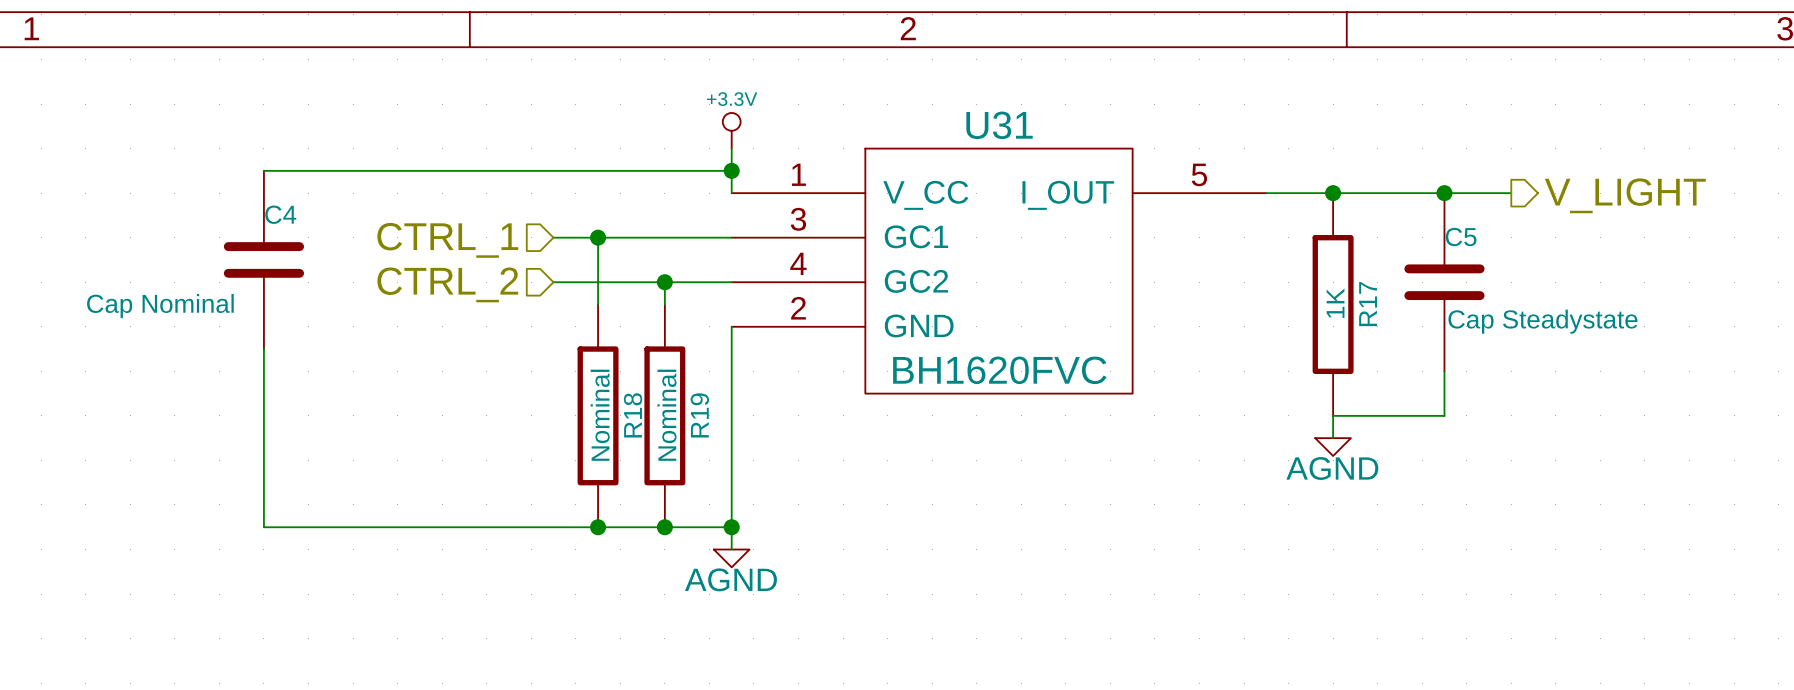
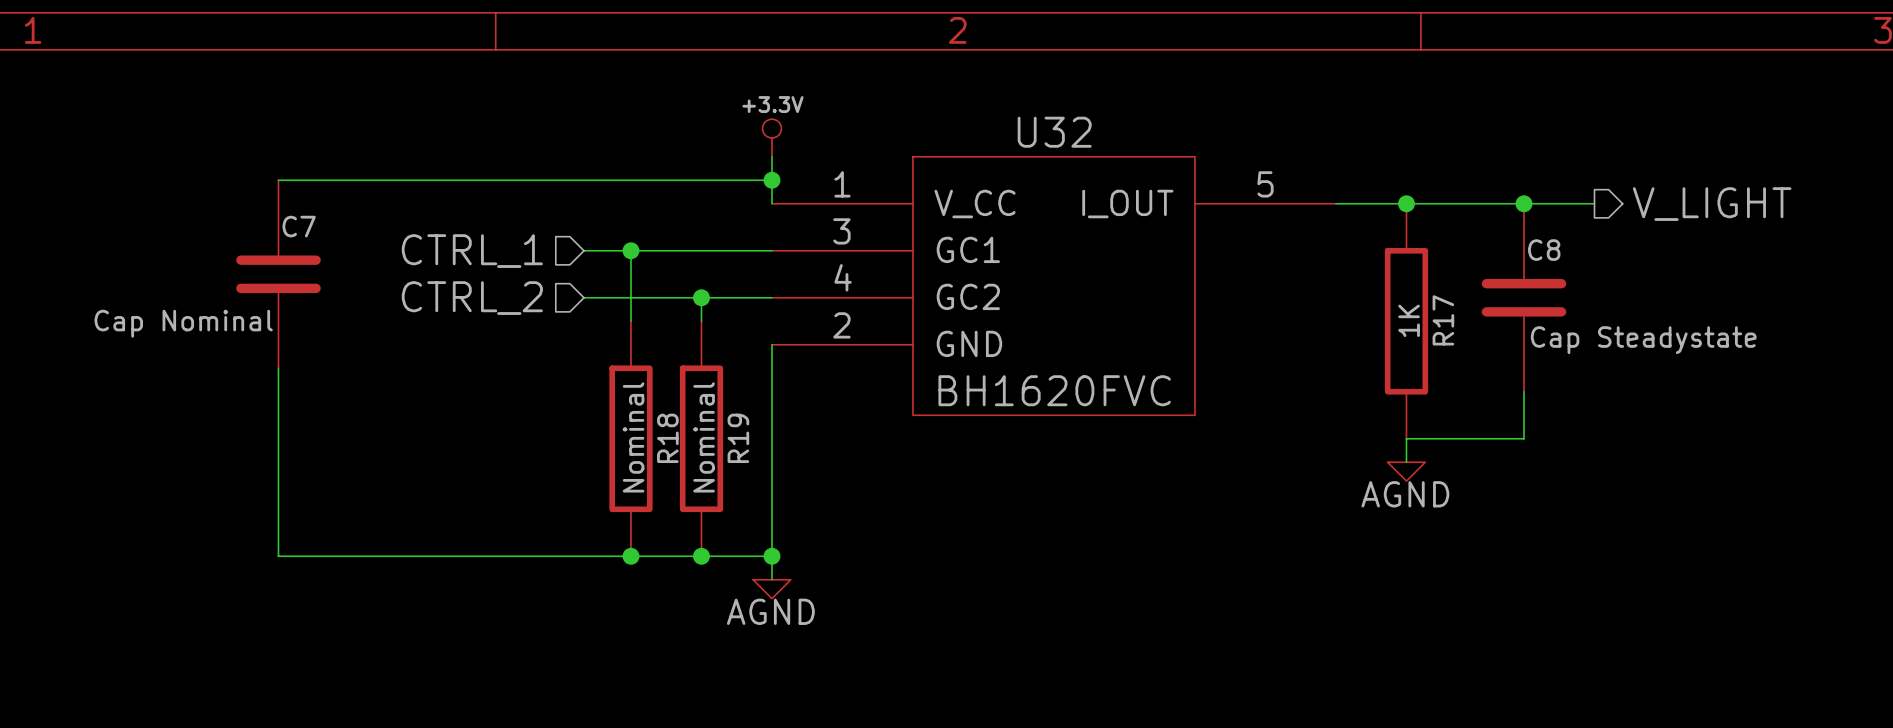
U31 name: U31 (999, 125) -> U32 (1054, 132)
C4 name: C4 (280, 214) -> C7 (299, 226)
C5 name: C5 (1461, 237) -> C8 (1544, 250)

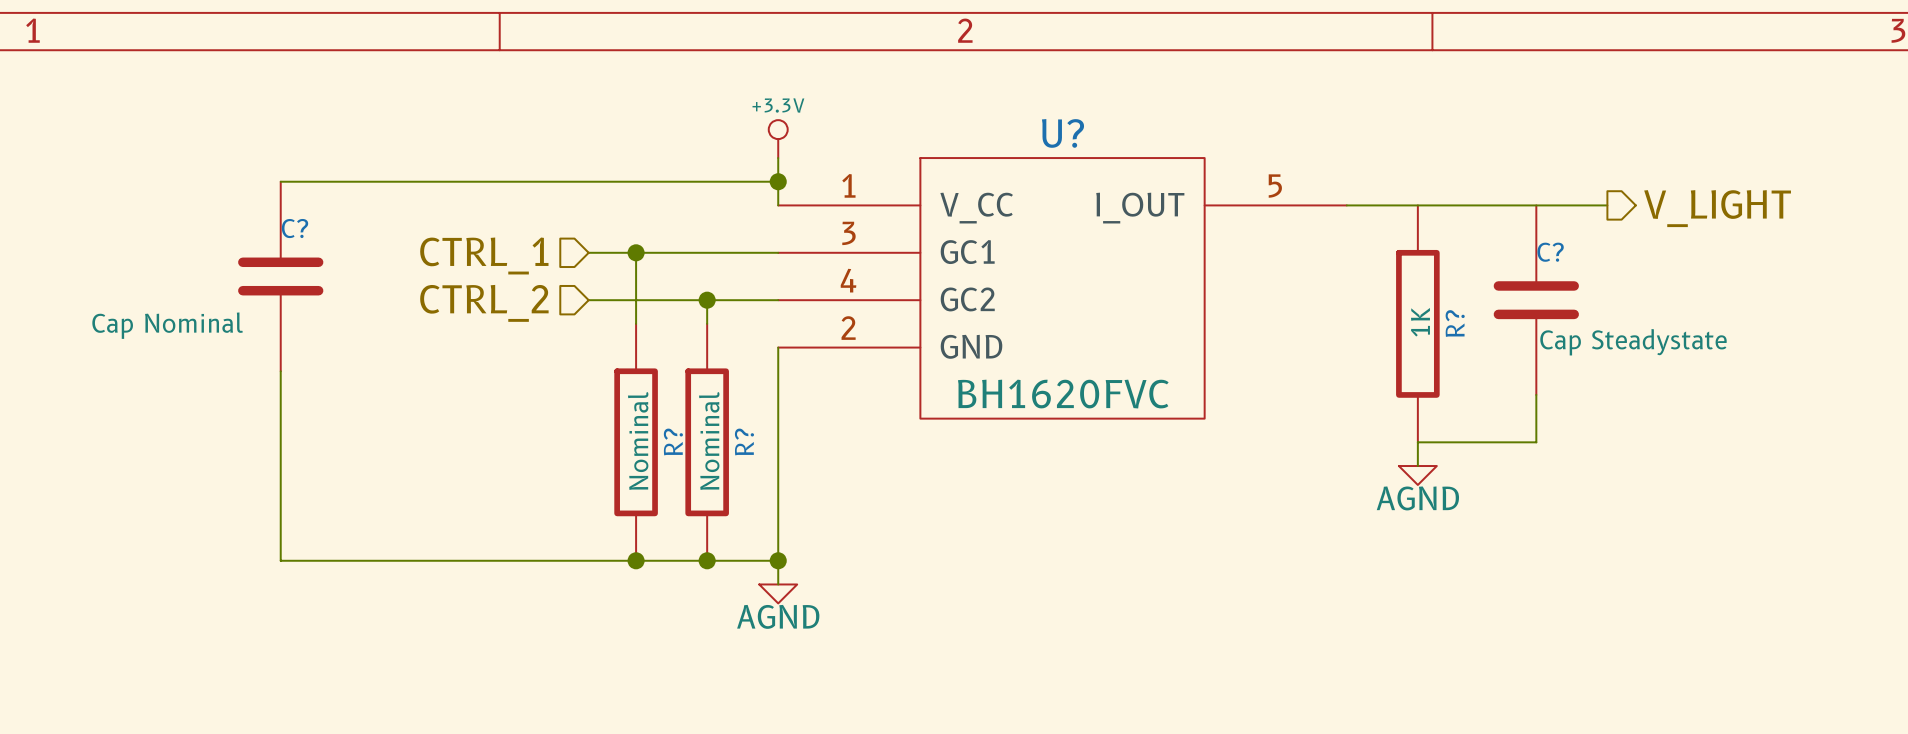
U32 name: U32 (1054, 132) -> U? (1062, 133)
junction: (1406, 203) -> none
junction: (1523, 203) -> none
C7 name: C7 (299, 226) -> C? (295, 228)
C8 name: C8 (1544, 250) -> C? (1550, 252)
R17 name: R17 (1443, 320) -> R? (1455, 323)
R18 name: R18 (667, 438) -> R? (673, 441)
R19 name: R19 (738, 438) -> R? (744, 441)

